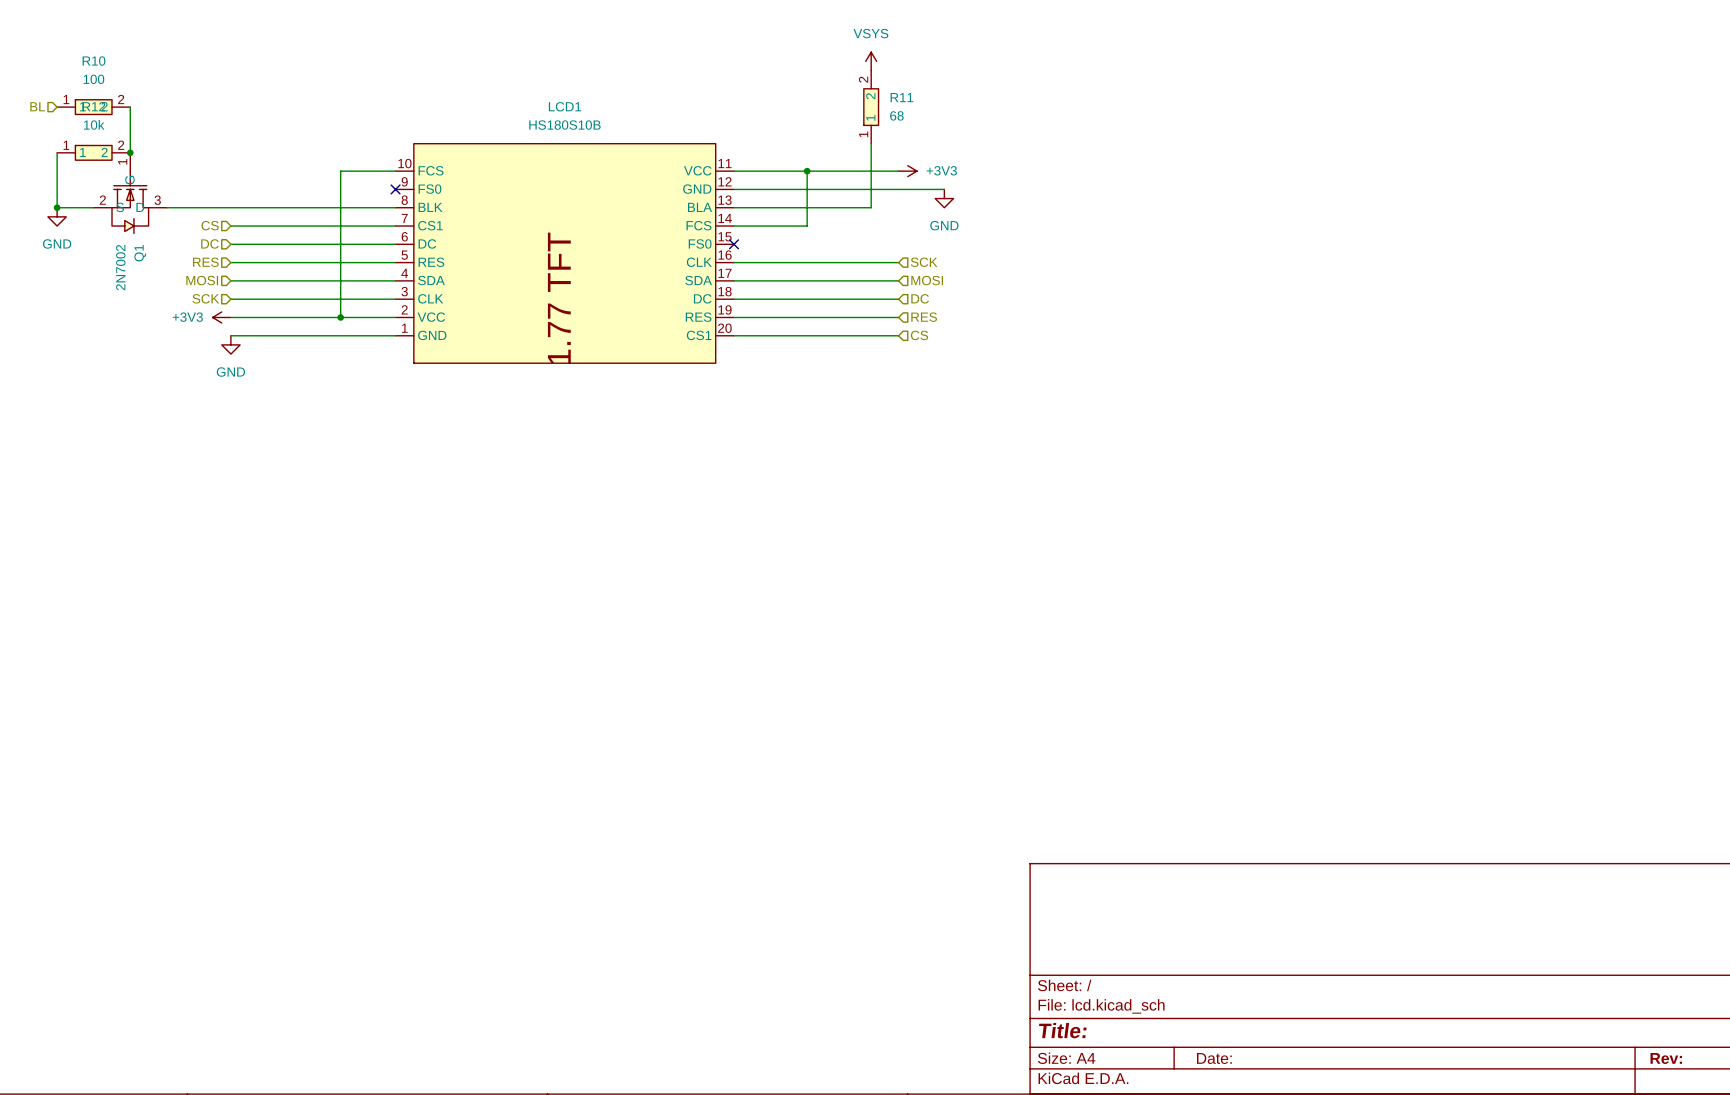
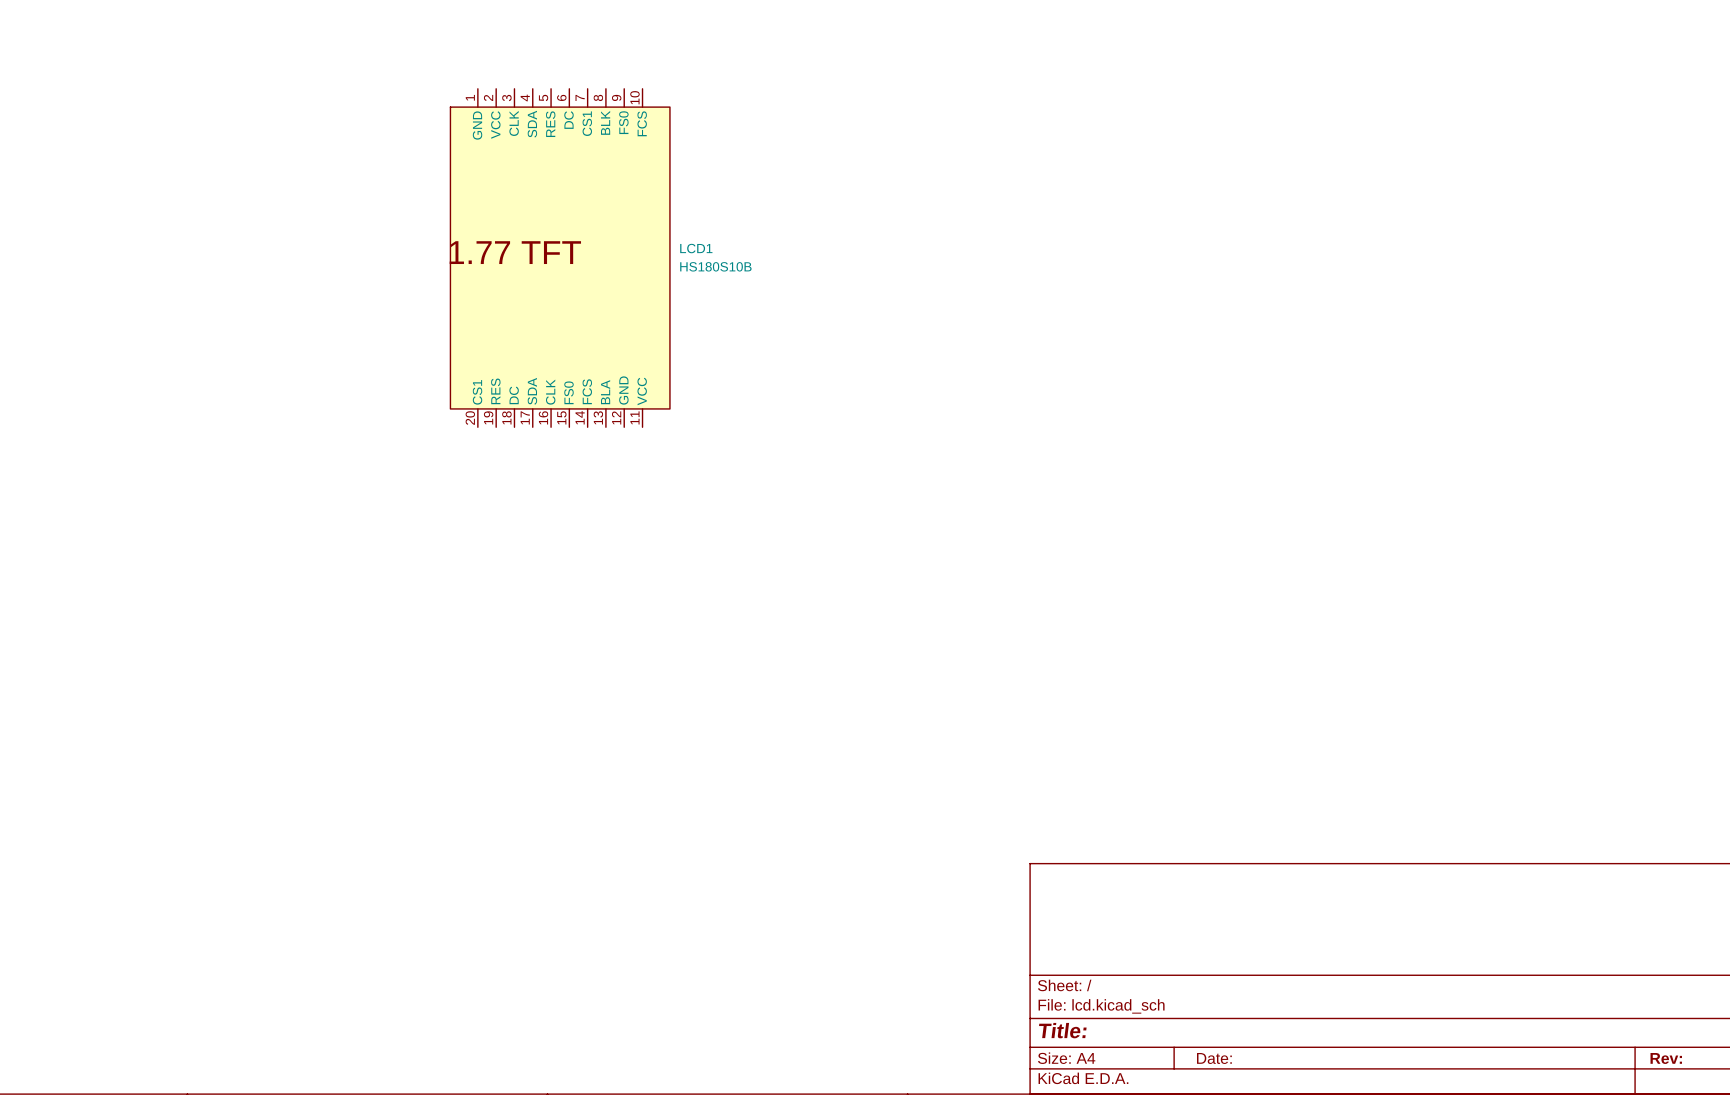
power symbol: VSYS (871, 61) -> none
hierarchical label: BL (37, 106) -> none
R10: 100 (93, 107) -> none
wire: (130, 107) (130, 152) -> none
R11: 68 (871, 107) -> none
LCD1 value position: HS180S10B (564, 125) -> HS180S10B (715, 266)
wire: (871, 143) (871, 207) (733, 207) -> none
wire: (57, 152) (57, 207) (93, 207) -> none
R12: 10k (93, 152) -> none
junction: (130, 152) -> none
wire: (395, 171) (340, 171) (340, 317) -> none
wire: (733, 171) (898, 171) -> none
wire: (807, 171) (807, 226) (733, 226) -> none
junction: (807, 171) -> none
power symbol: +3V3 (907, 171) -> none
no-connect mark: (395, 189) -> none
wire: (733, 189) (944, 189) -> none
Q1: 2N7002 (130, 193) -> none
power symbol: GND (944, 198) -> none
junction: (57, 207) -> none
wire: (166, 207) (395, 207) -> none
power symbol: GND (57, 216) -> none
hierarchical label: CS (210, 225) -> none
wire: (230, 226) (395, 226) -> none
hierarchical label: DC (209, 243) -> none
wire: (230, 244) (395, 244) -> none
no-connect mark: (733, 244) -> none
LCD1 rotation: 0° (564, 253) -> 90° clockwise (560, 258)
hierarchical label: RES (205, 262) -> none
wire: (230, 262) (395, 262) -> none
wire: (733, 262) (898, 262) -> none
hierarchical label: SCK (924, 262) -> none
hierarchical label: MOSI (202, 280) -> none
wire: (230, 280) (395, 280) -> none
wire: (733, 280) (898, 280) -> none
hierarchical label: MOSI (927, 280) -> none
hierarchical label: SCK (205, 298) -> none
hierarchical label: DC (920, 298) -> none
wire: (230, 299) (395, 299) -> none
wire: (733, 299) (898, 299) -> none
power symbol: +3V3 (221, 317) -> none
wire: (230, 317) (395, 317) -> none
junction: (340, 317) -> none
wire: (733, 317) (898, 317) -> none
hierarchical label: RES (924, 317) -> none
wire: (230, 335) (395, 335) -> none
wire: (733, 335) (898, 335) -> none
hierarchical label: CS (919, 335) -> none
power symbol: GND (230, 344) -> none

